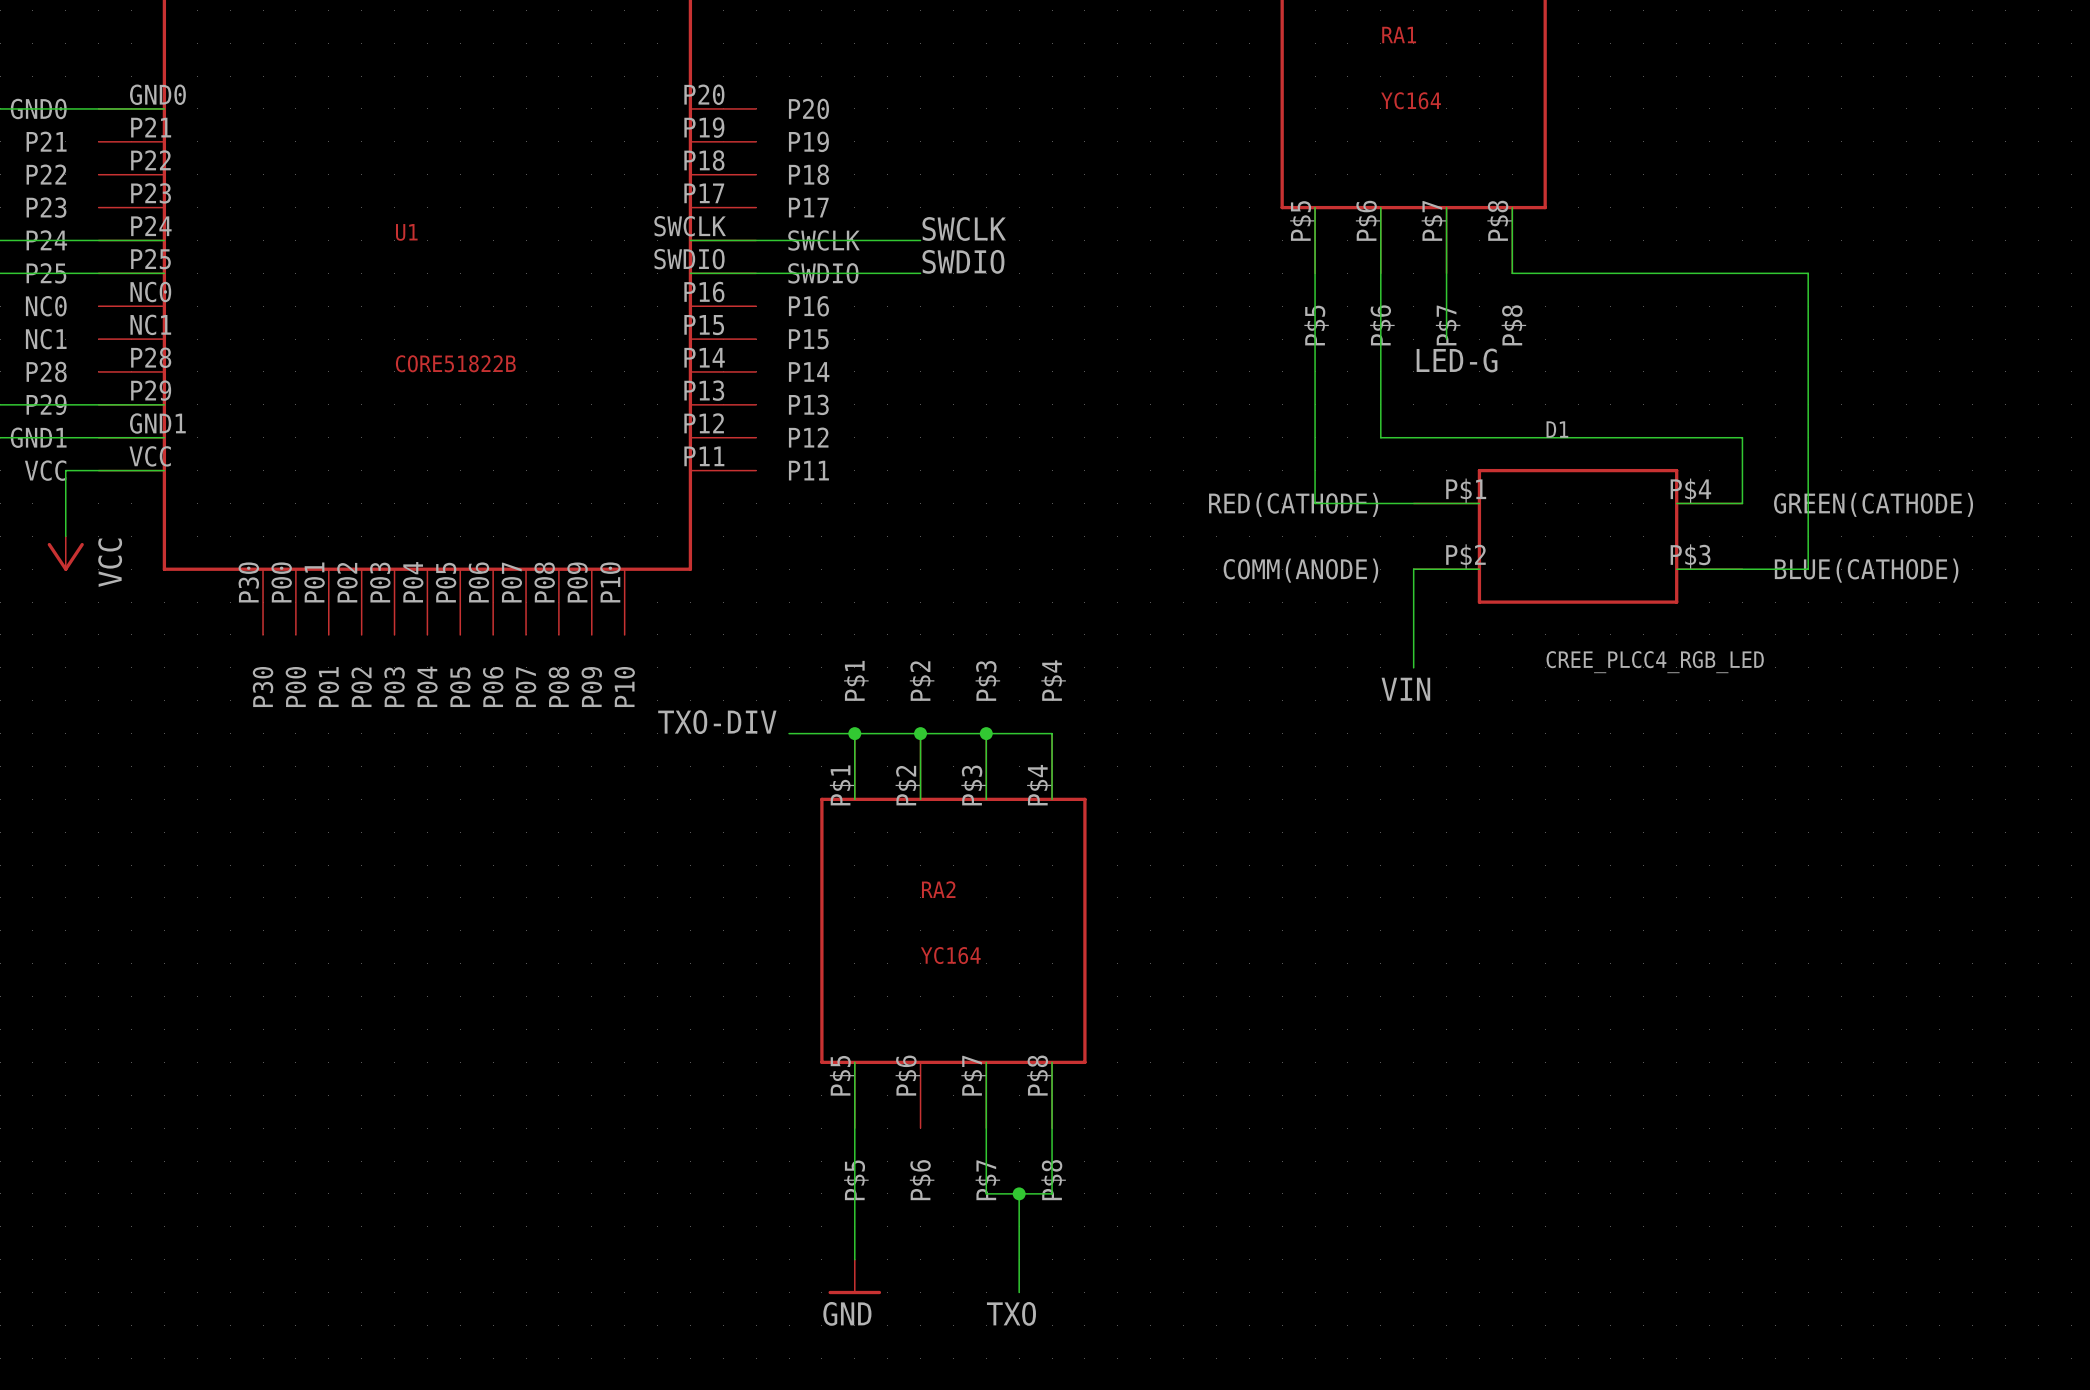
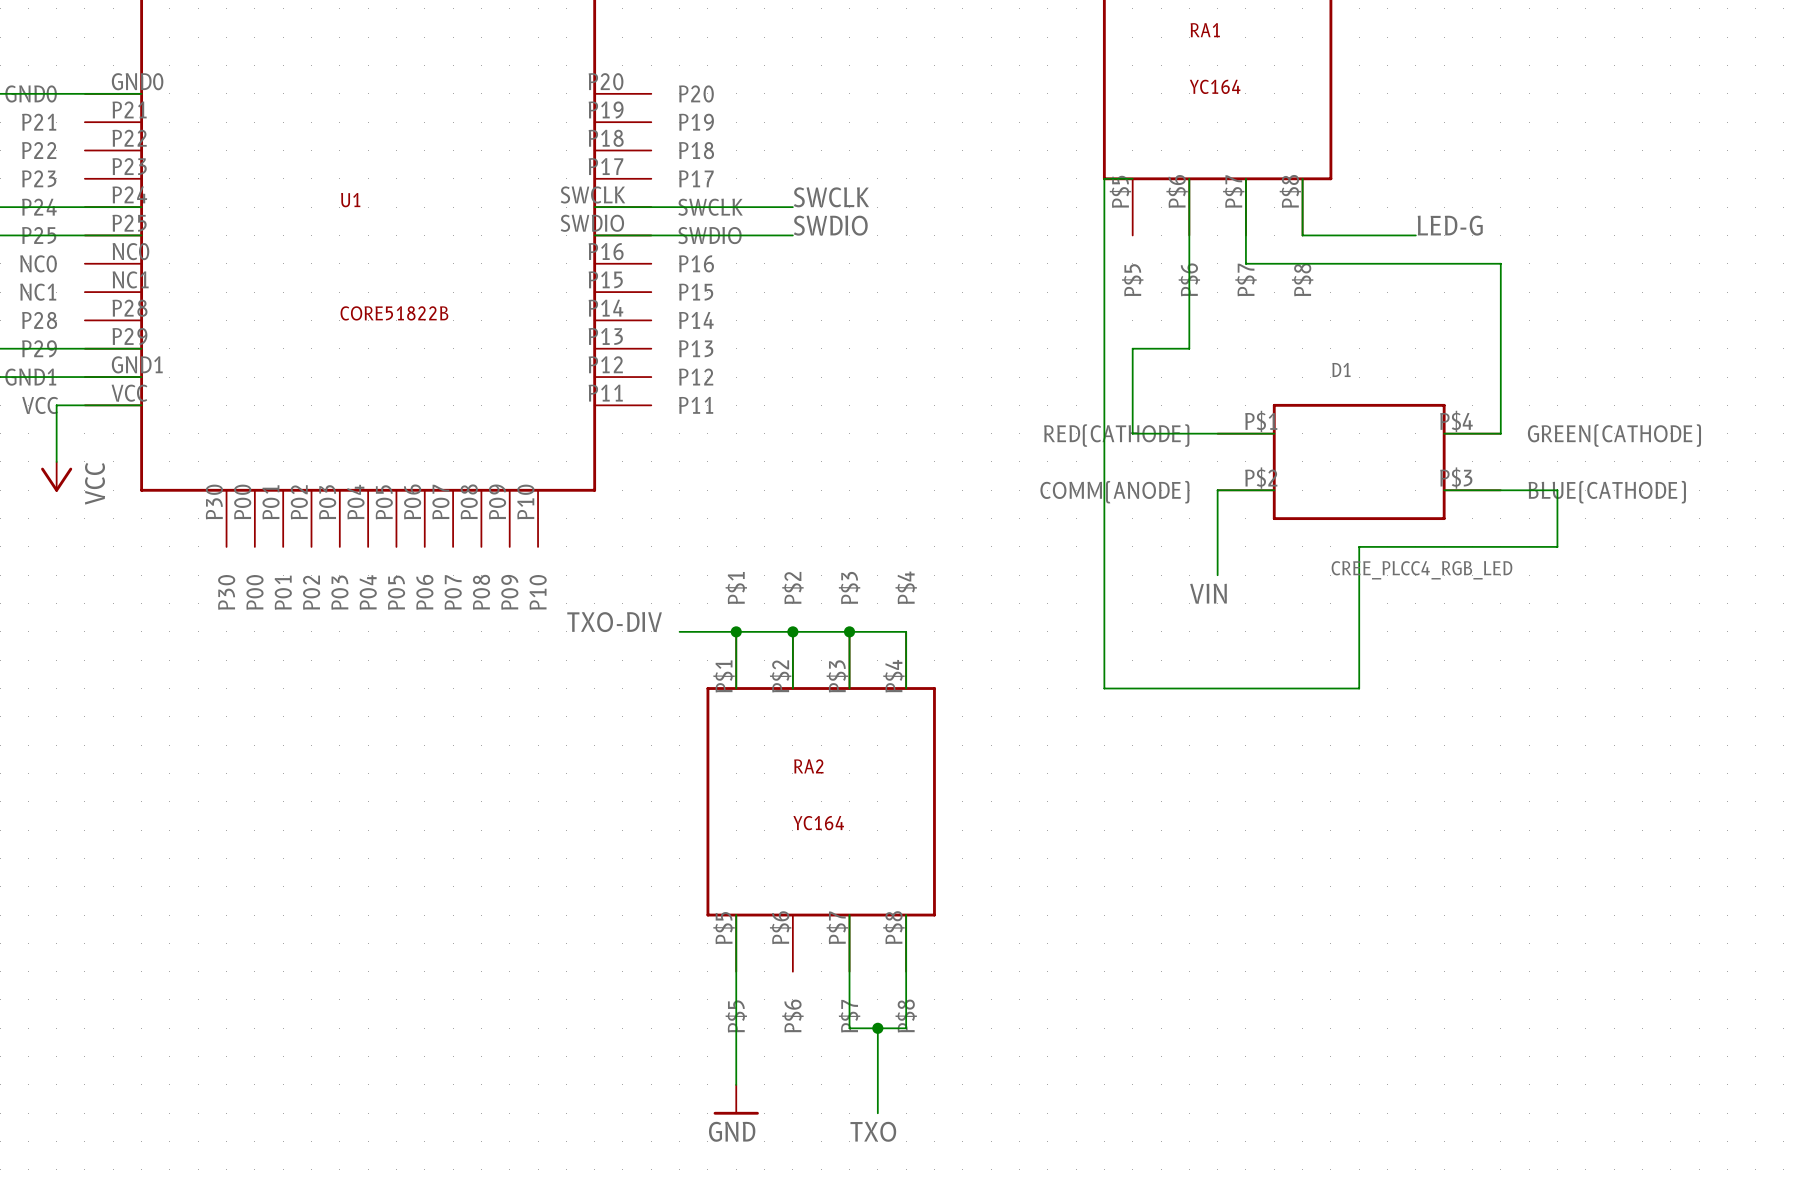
wire: (1315, 207) (1315, 404) -> (1189, 348) (1132, 348)
wire: (1643, 273) (1808, 273) (1808, 569) -> (1132, 178) (1104, 178) (1104, 688) (1359, 688) (1359, 546) (1557, 546) (1557, 490)
wire: (1446, 306) (1446, 339) -> none
label position: LED-G (1457, 360) -> LED-G (1450, 225)
wire: (1380, 404) (1380, 437) (1742, 437) -> (1245, 263) (1500, 263) (1500, 377)

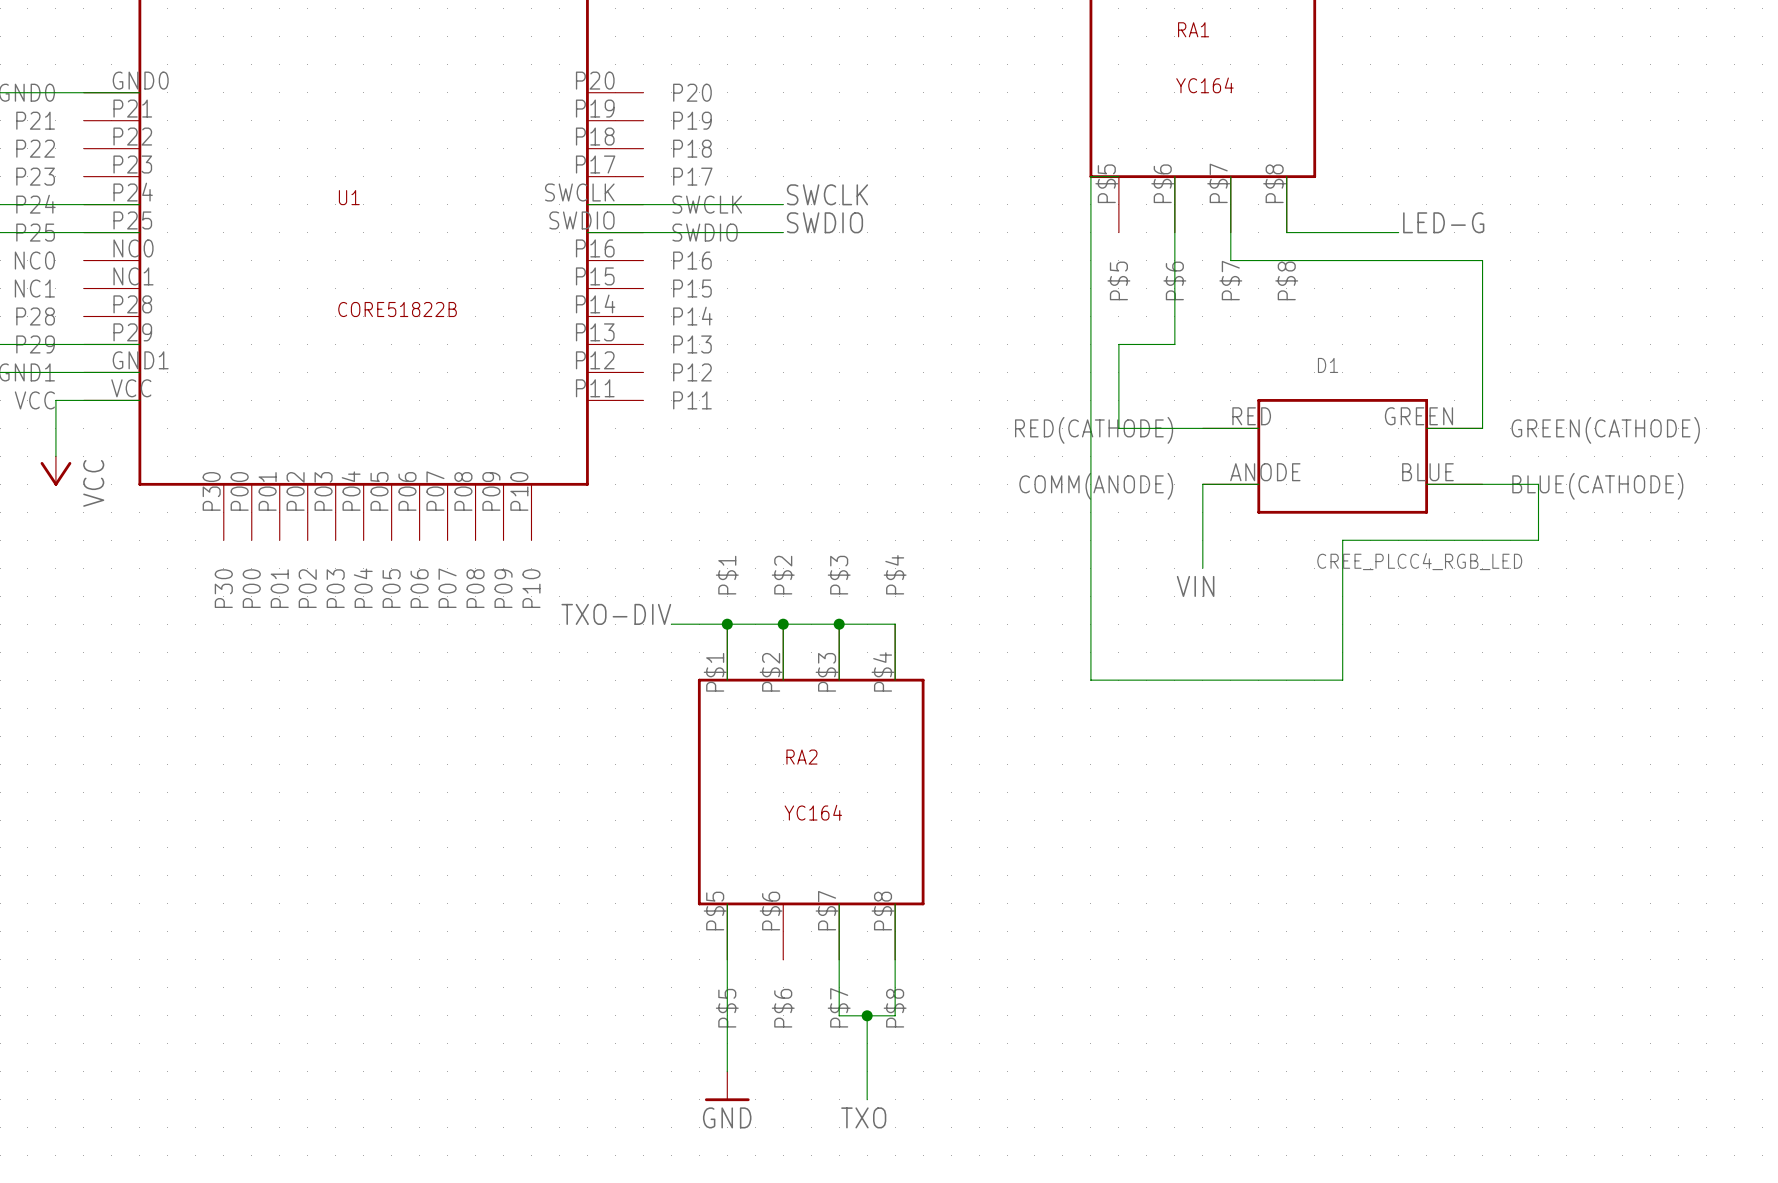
D1 pin number: P$1 (1261, 421) -> RED (1251, 416)
D1 pin number: P$4 (1456, 421) -> GREEN (1418, 416)
D1 pin number: P$2 (1261, 478) -> ANODE (1265, 472)
D1 pin number: P$3 (1456, 478) -> BLUE (1427, 472)

